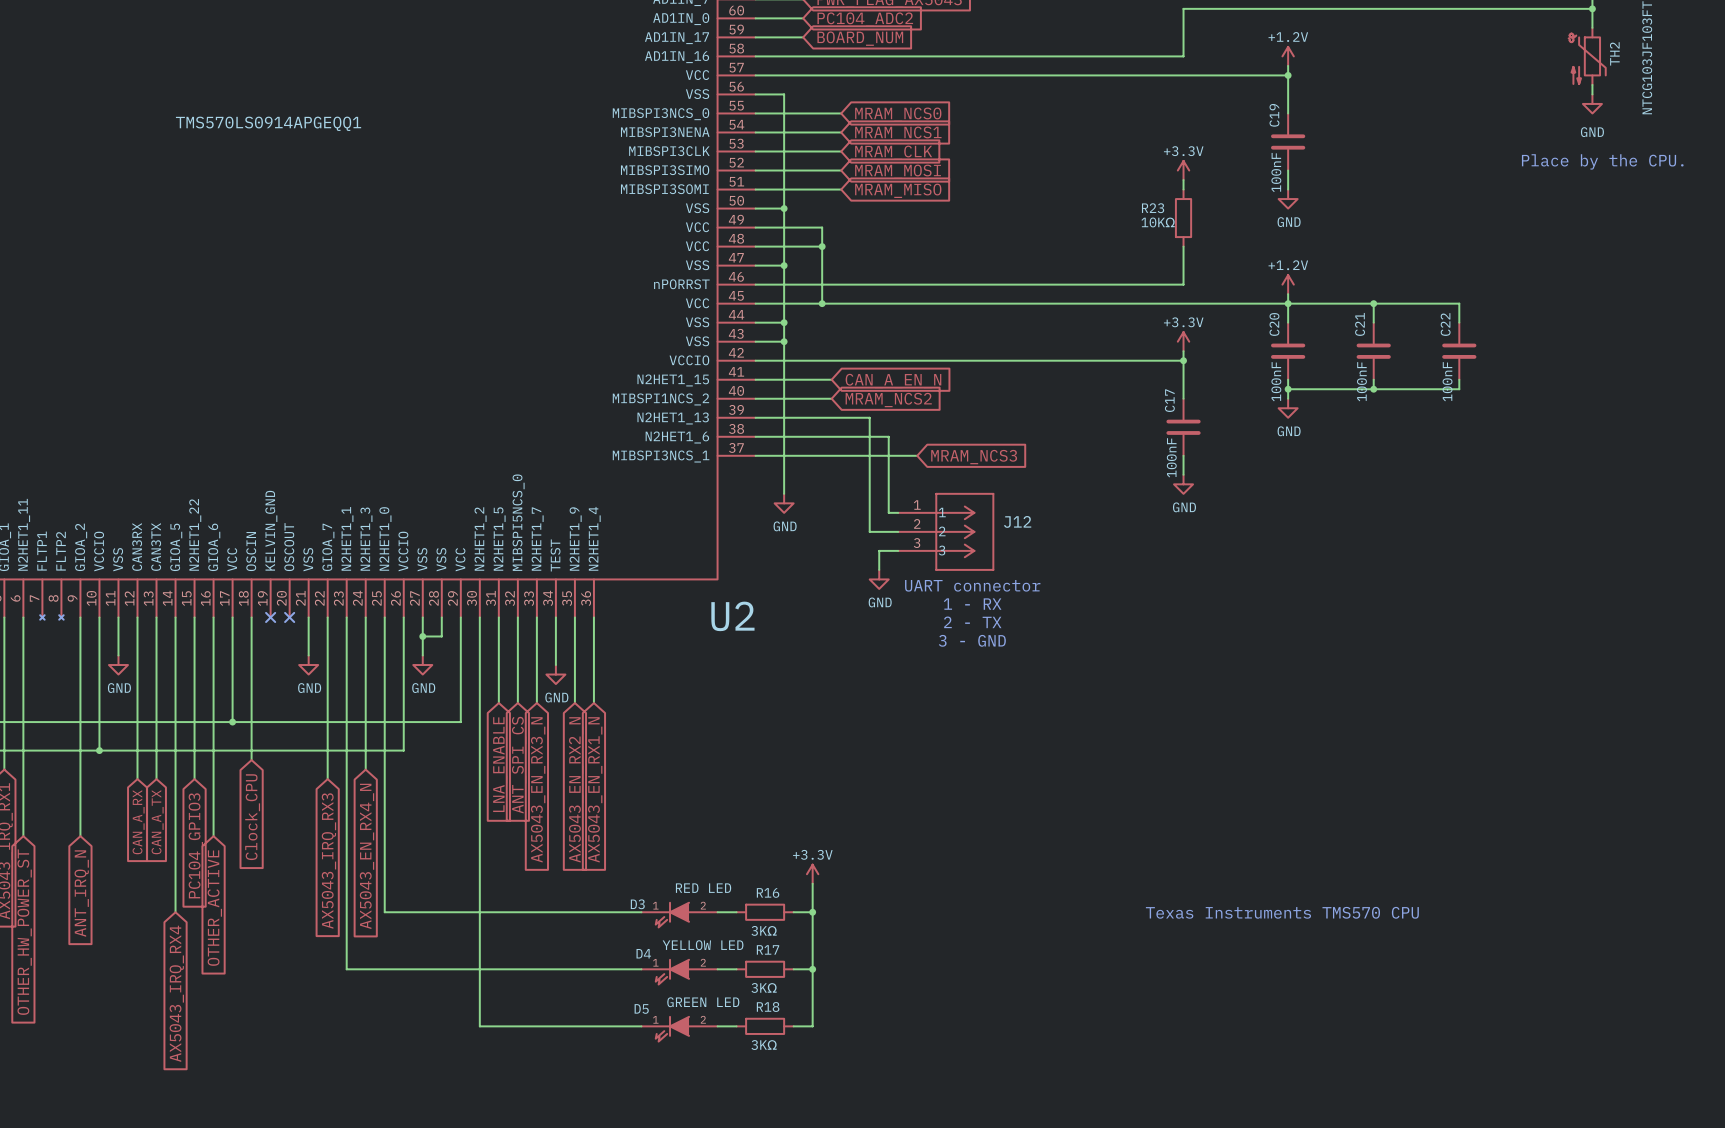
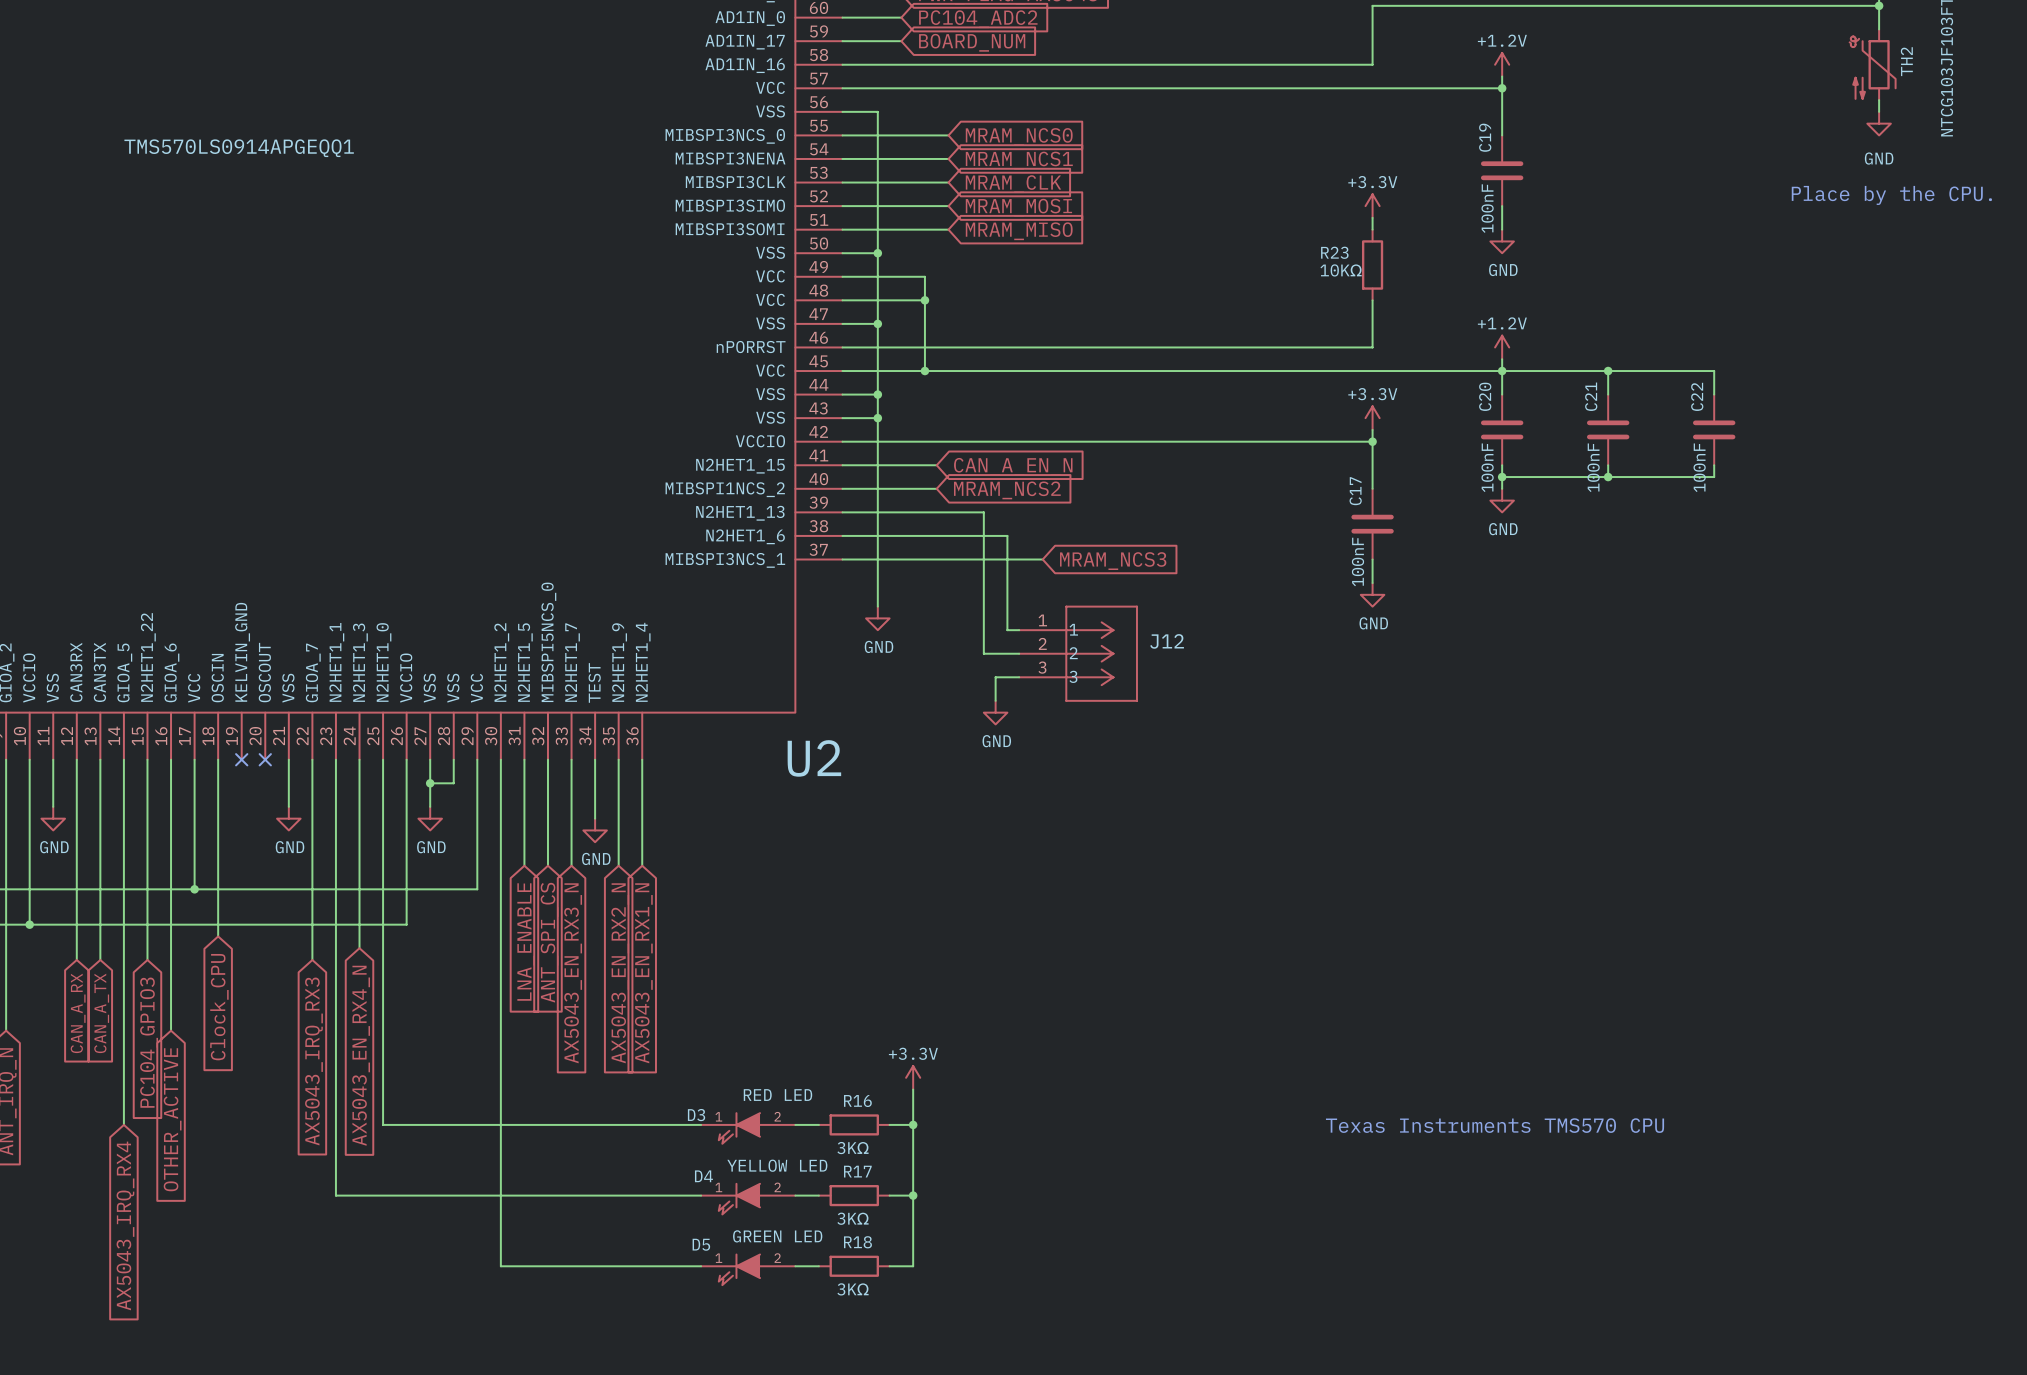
text: UART connector (972, 585) -> none
text: 1 - RX (972, 604) -> none
text: 2 - TX (972, 622) -> none
text: 3 - GND (972, 640) -> none

